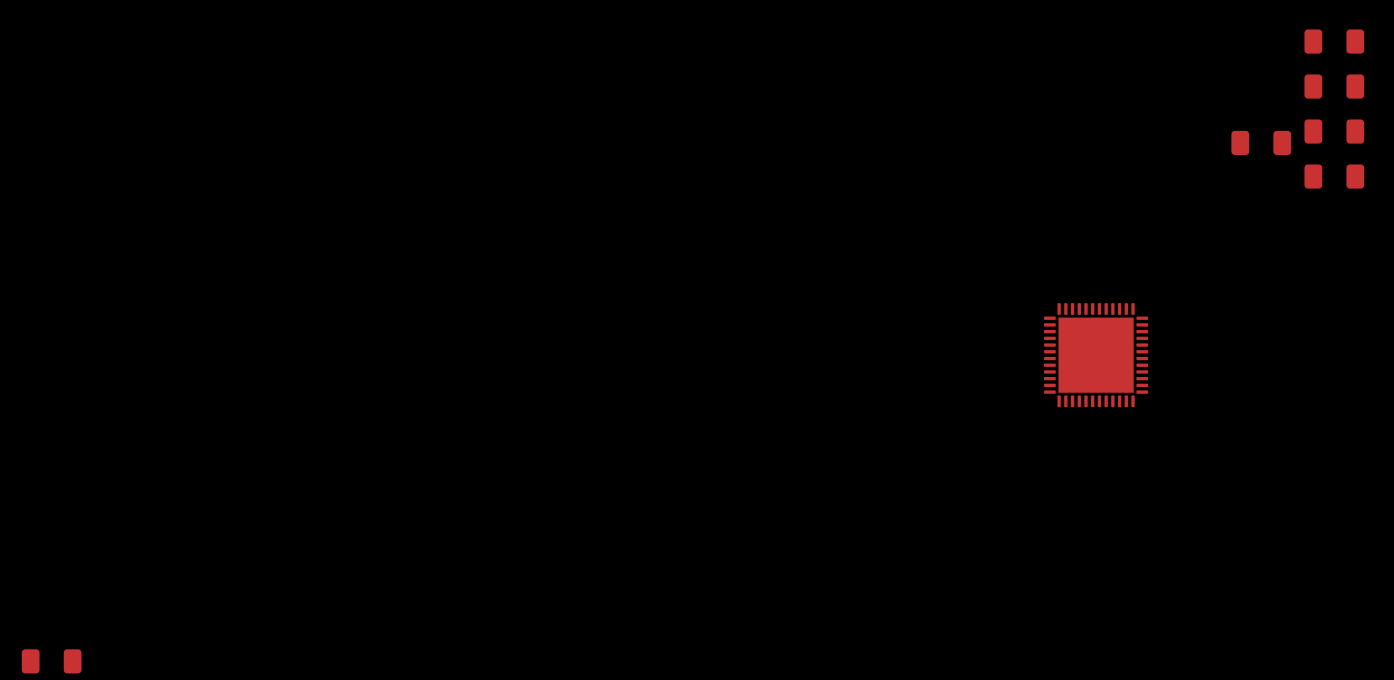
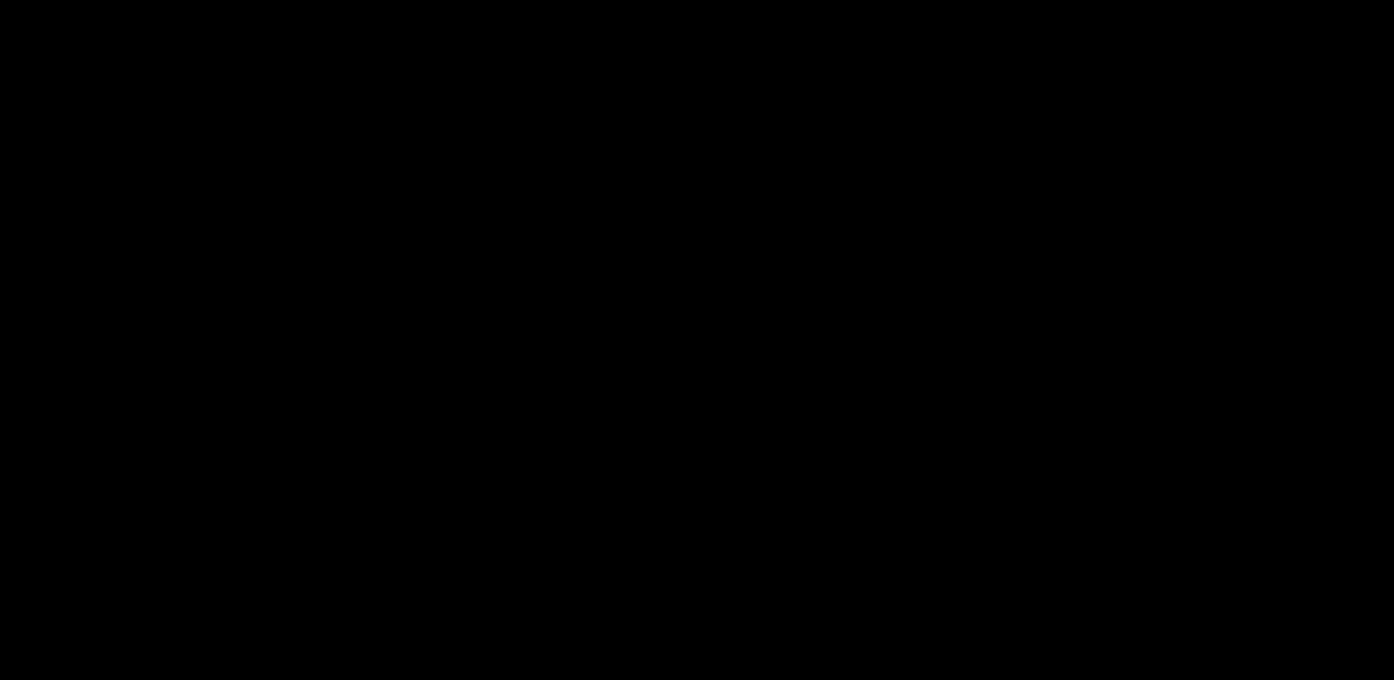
part: (1334, 41) -> none
part: (1334, 86) -> none
part: (1334, 131) -> none
part: (1261, 142) -> none
part: (1334, 176) -> none
part: (1096, 355) -> none
part: (51, 661) -> none

